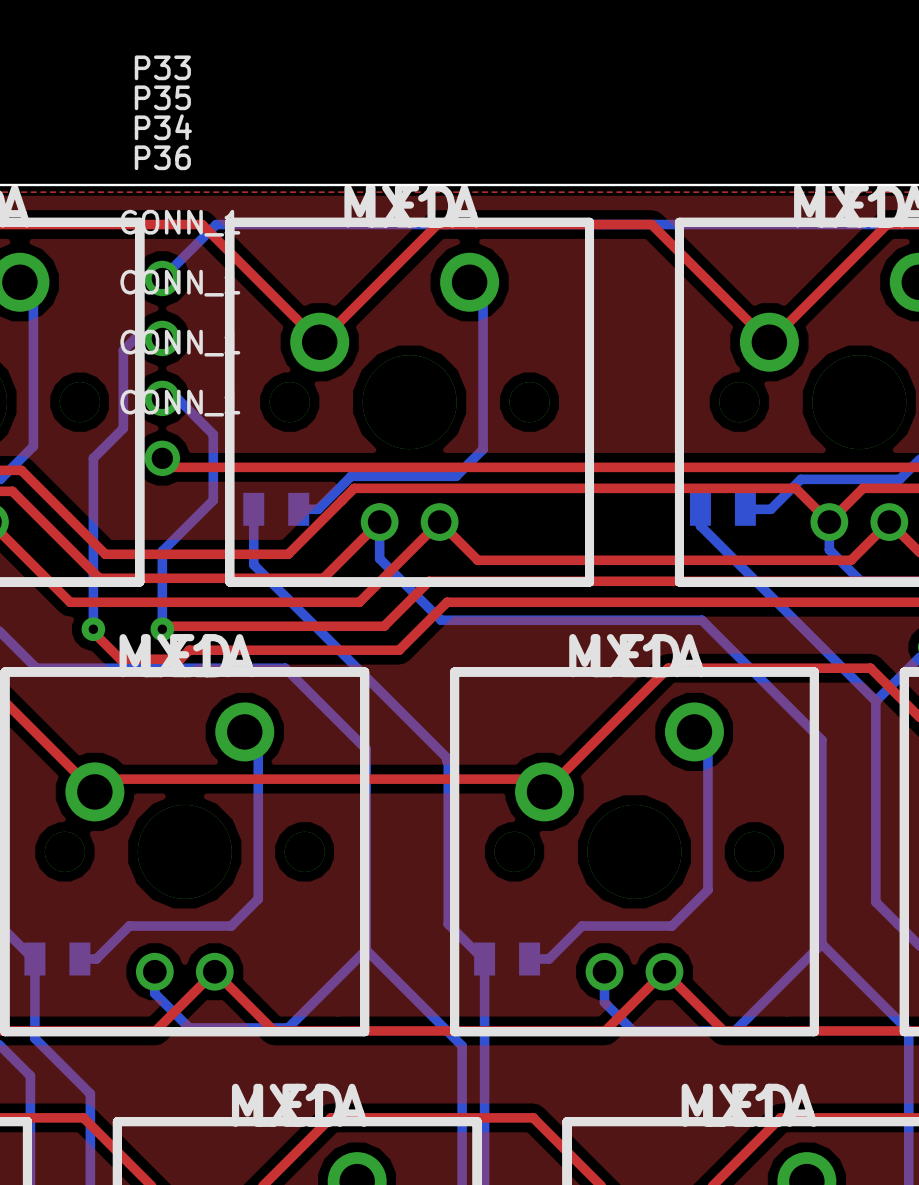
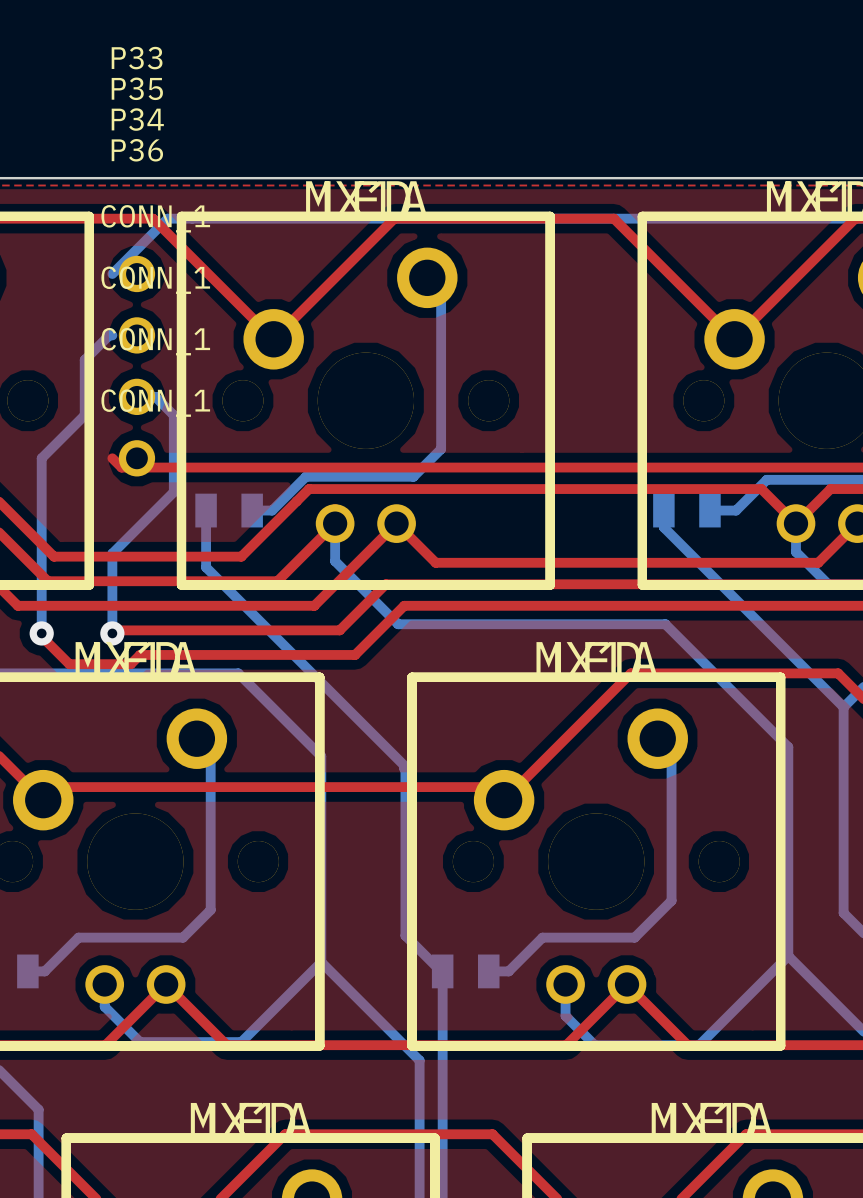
P33 position: (162, 278) -> (136, 273)
bottom track: (159, 338) (135, 338) (123, 350) (123, 428) -> (109, 335) (84, 360) (84, 415) (72, 427)
P35 position: (162, 338) -> (136, 335)
bottom track: (150, 398) (177, 398) (213, 434) (213, 500) -> (136, 396) (155, 396) (173, 415) (173, 492) (164, 501)
P34 position: (162, 398) -> (136, 396)
P36 position: (162, 458) -> (136, 458)

